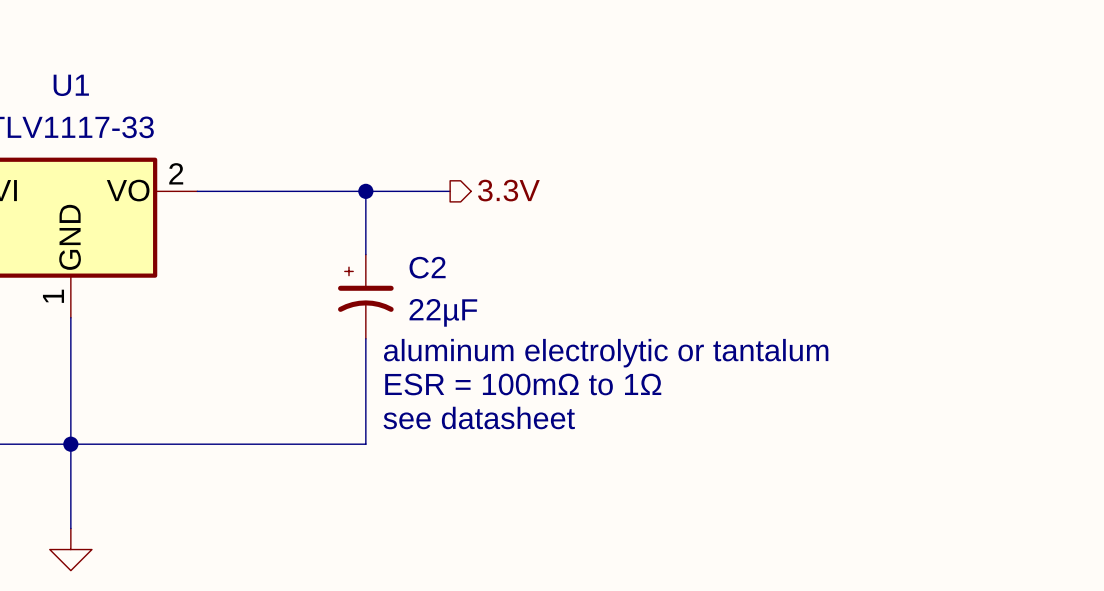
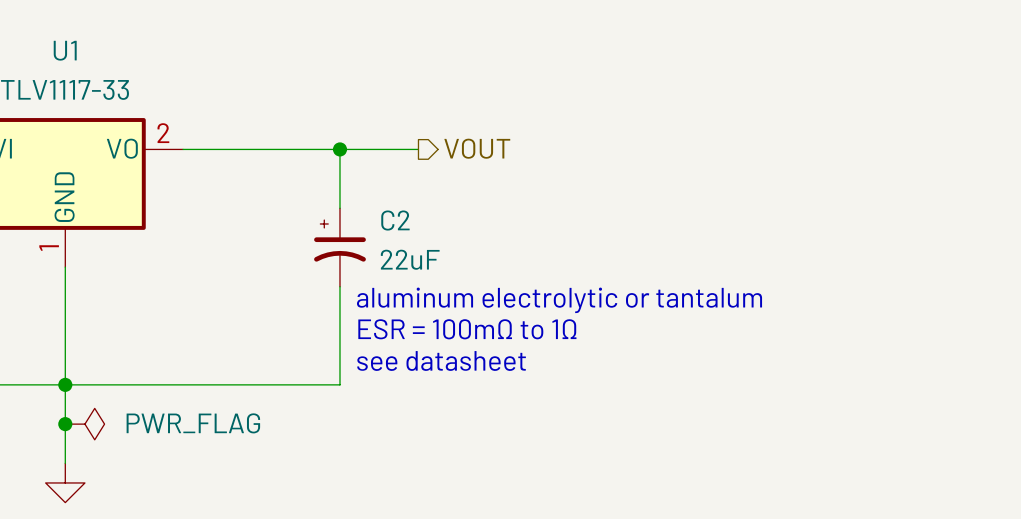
hierarchical label: 3.3V (508, 190) -> VOUT (477, 148)
C2 value: 22µF (443, 312) -> 22uF (410, 259)
junction: none -> (65, 424)
power symbol: none -> PWR_FLAG (84, 424)

